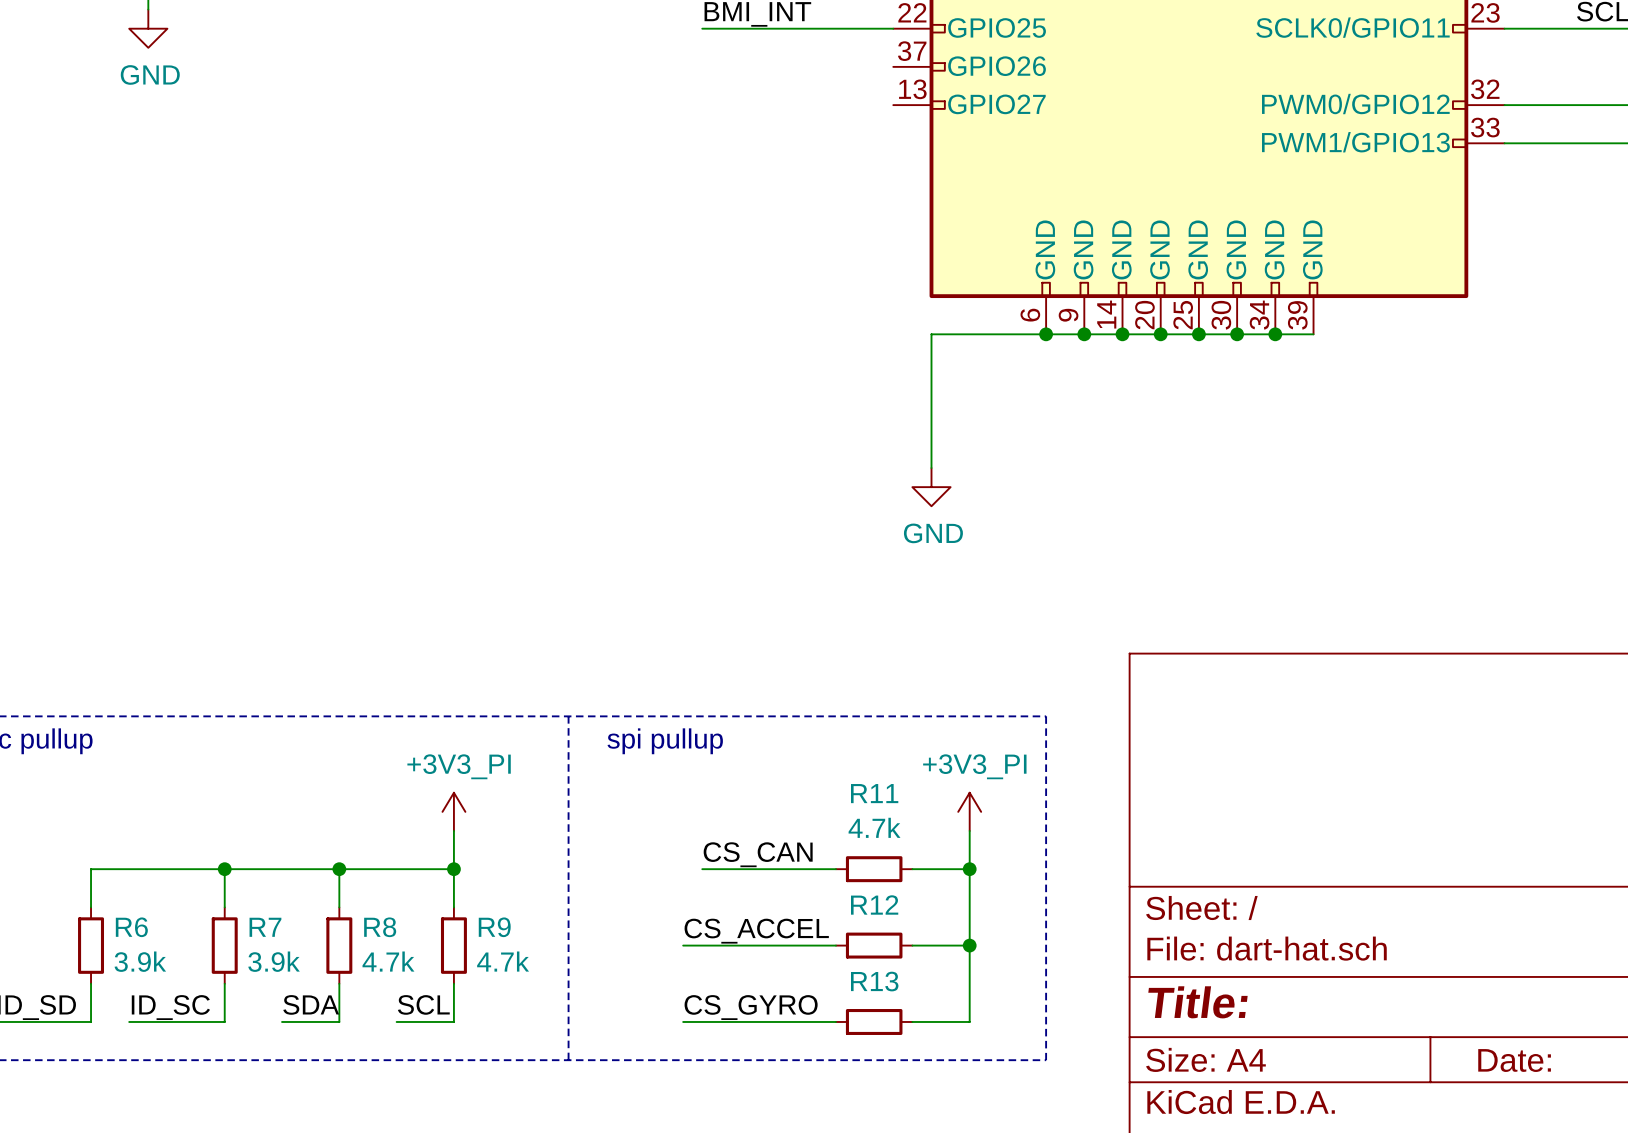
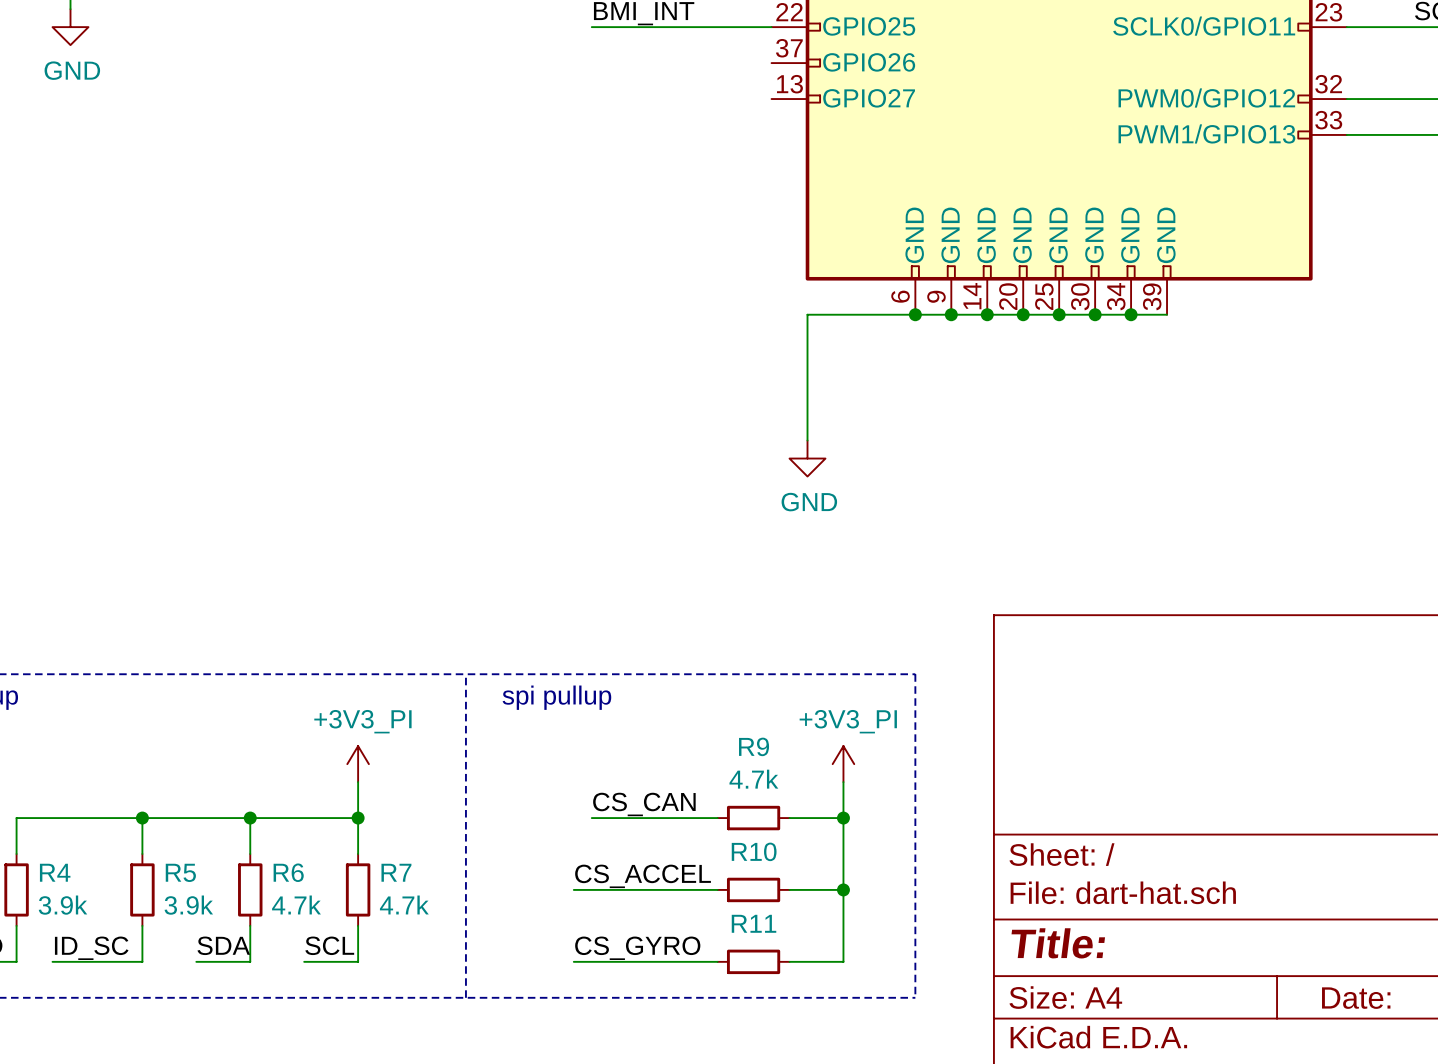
R11 name: R11 (874, 793) -> R9 (754, 746)
R12 name: R12 (874, 904) -> R10 (754, 851)
R6 name: R6 (131, 927) -> R4 (55, 872)
R7 name: R7 (265, 927) -> R5 (180, 872)
R8 name: R8 (380, 927) -> R6 (288, 872)
R9 name: R9 (494, 927) -> R7 (396, 872)
R13 name: R13 (874, 981) -> R11 (754, 923)

